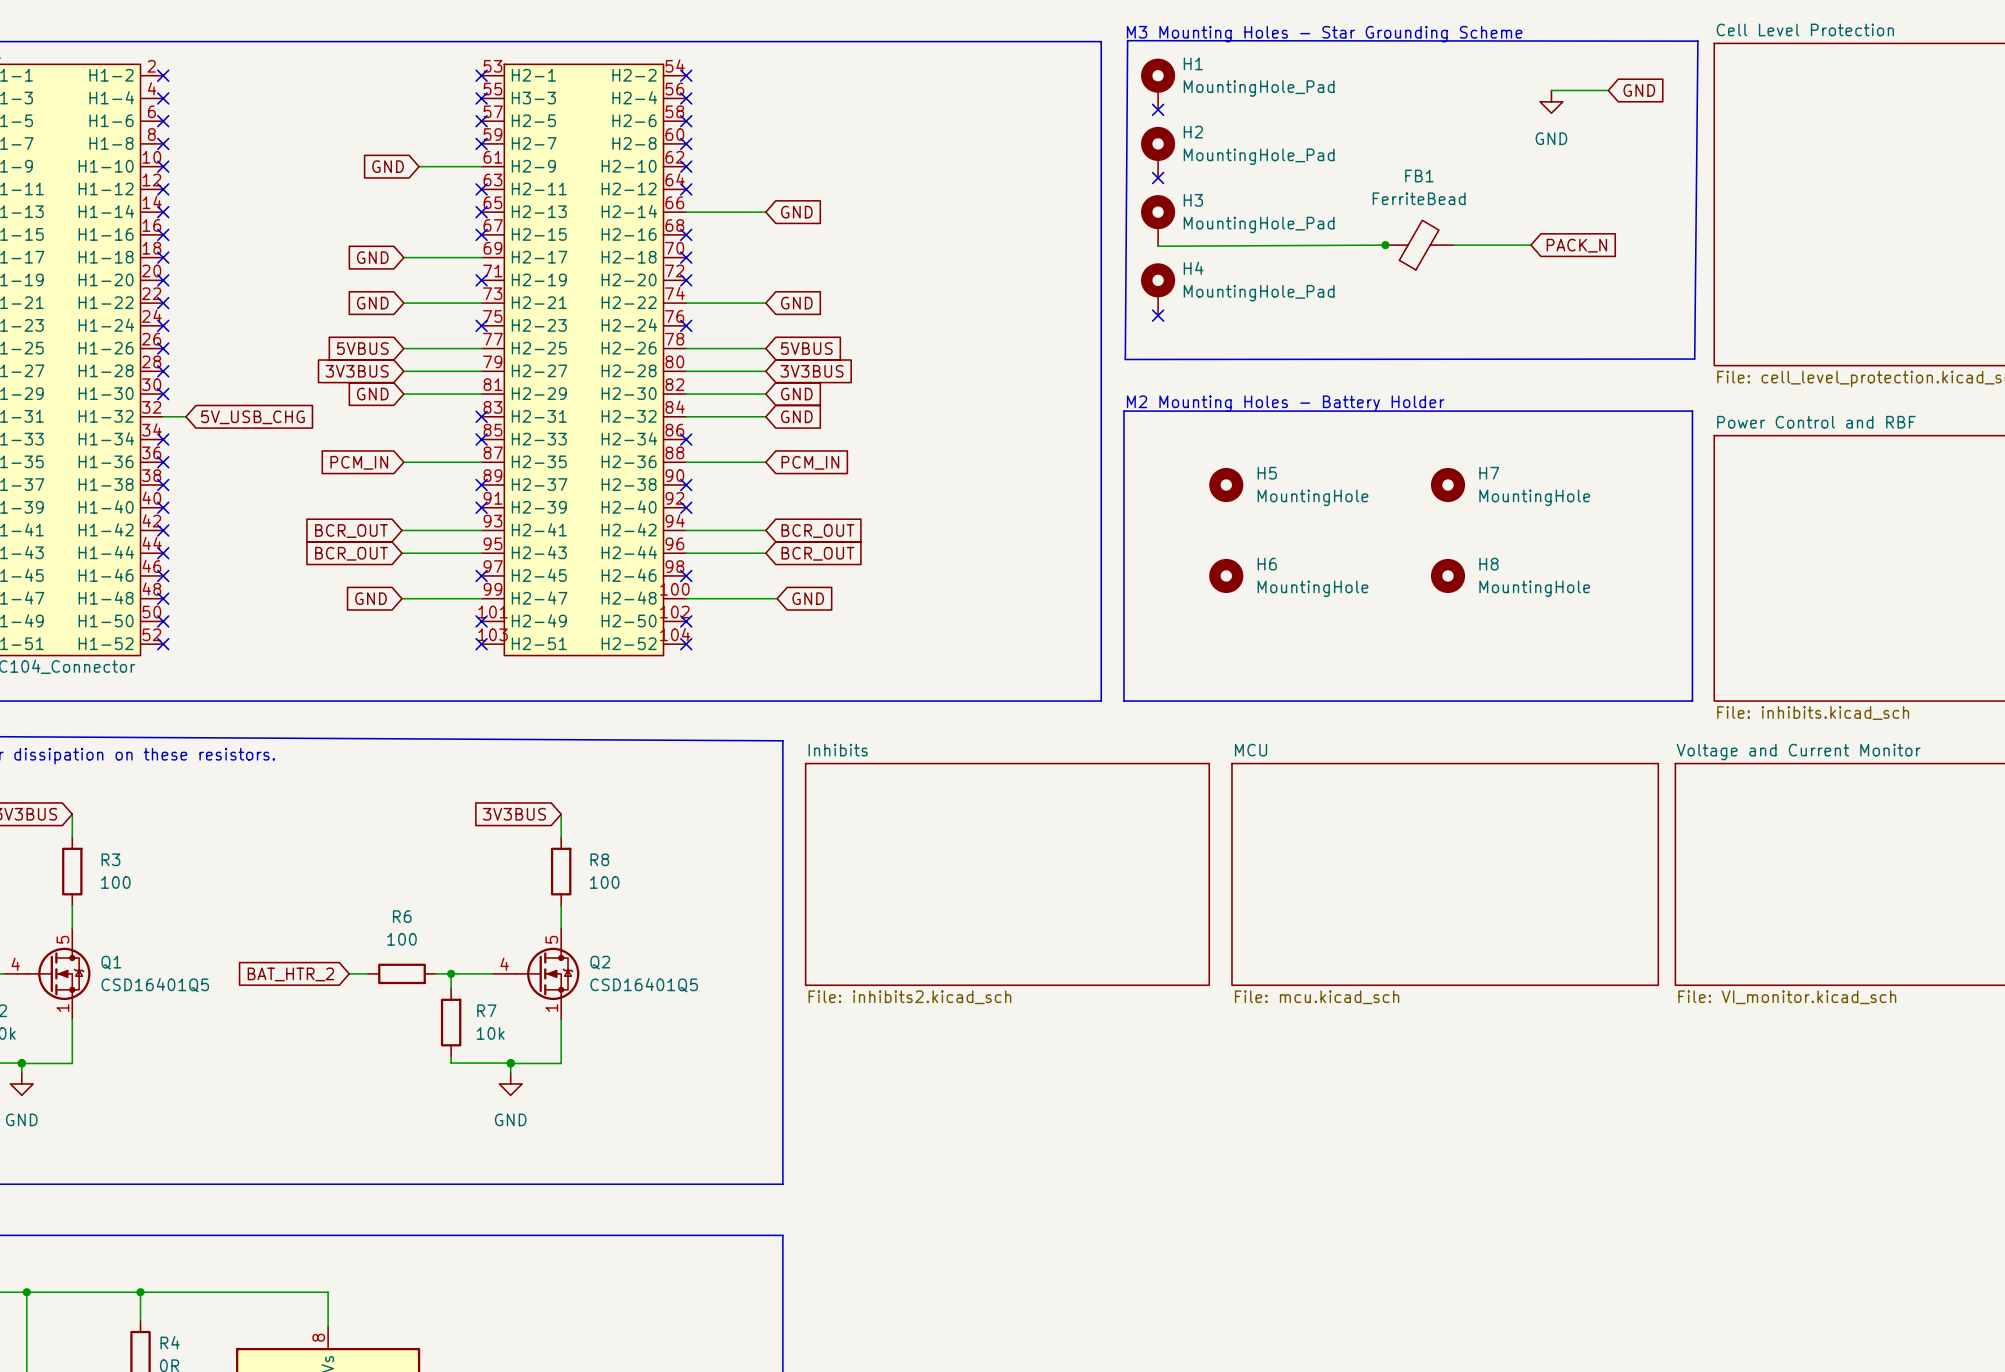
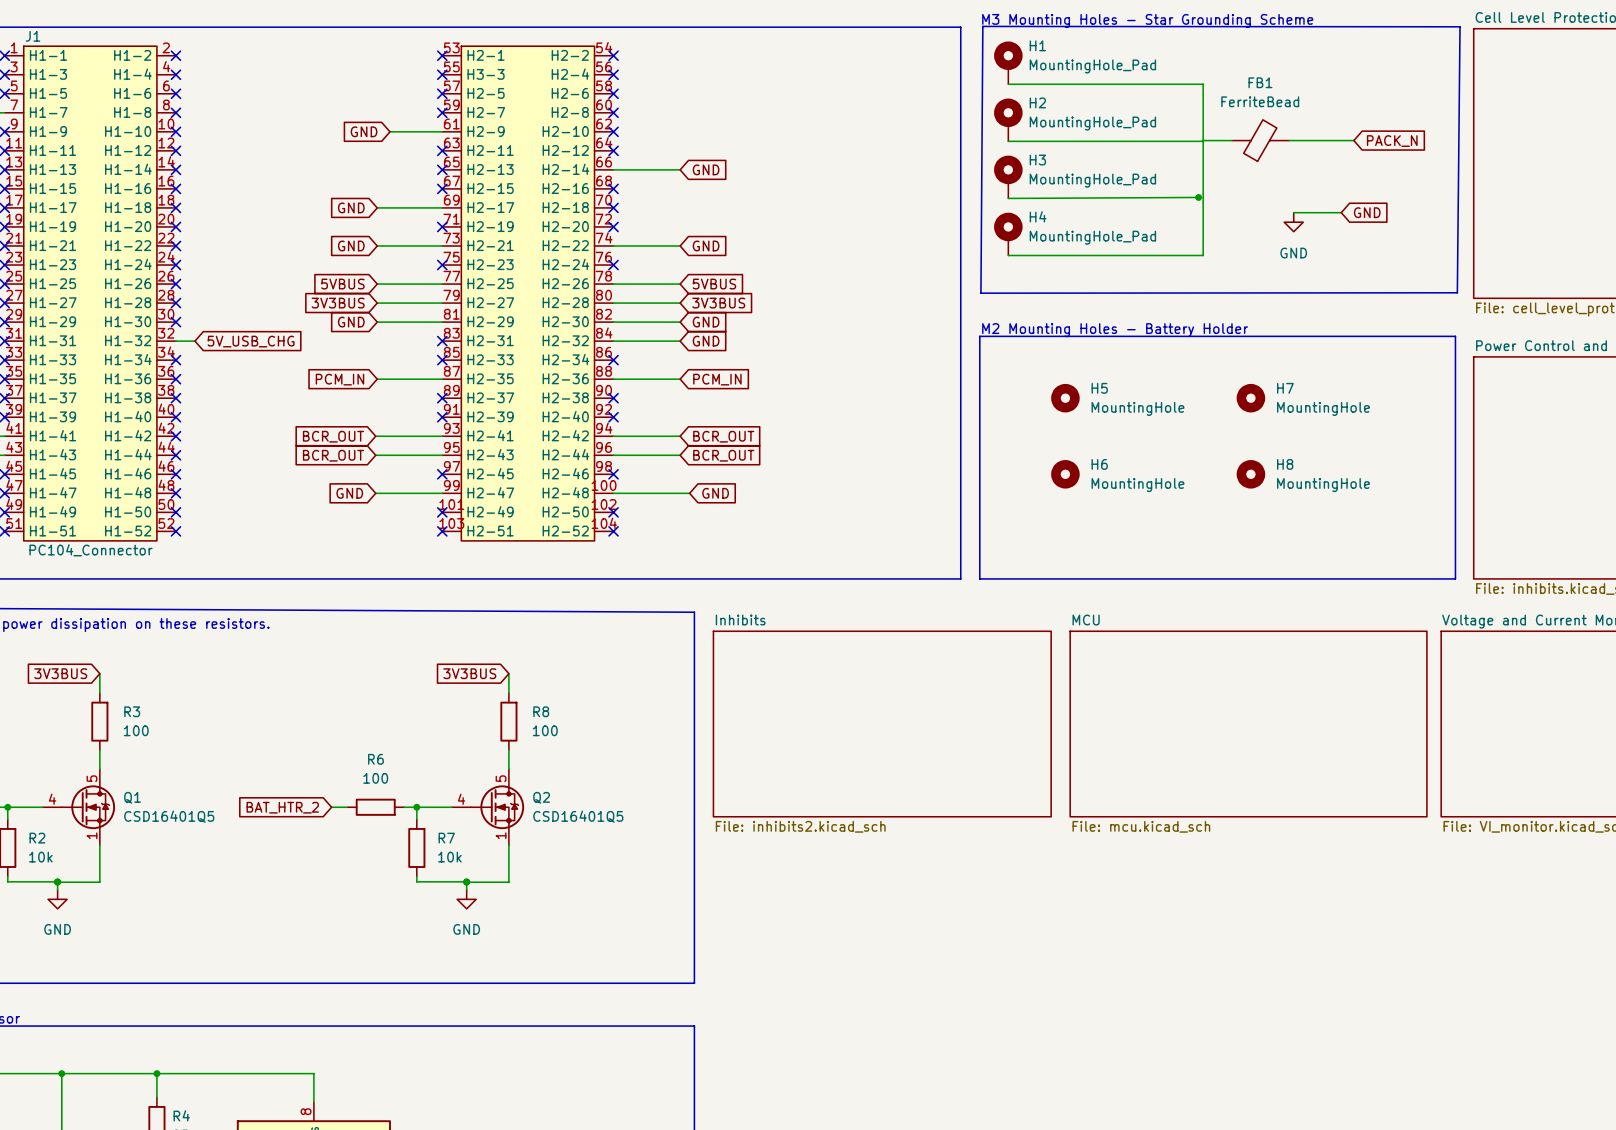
wire: (1551, 90) (1608, 90) -> (1293, 212) (1341, 212)
global label position: GND (1639, 90) -> GND (1367, 212)
power symbol position: GND (1551, 101) -> GND (1293, 222)
wire: none -> (1008, 84) (1203, 84) (1203, 255) (1008, 255)
no-connect mark: (1158, 109) -> none
wire: none -> (1203, 140) (1232, 140)
wire: none -> (1008, 141) (1203, 141)
no-connect mark: (1158, 178) -> none
FB1 position: (1419, 245) -> (1260, 140)
wire: (1453, 245) (1531, 245) -> (1289, 140) (1353, 140)
global label position: PACK_N (1576, 245) -> PACK_N (1392, 141)
no-connect mark: (1158, 315) -> none

